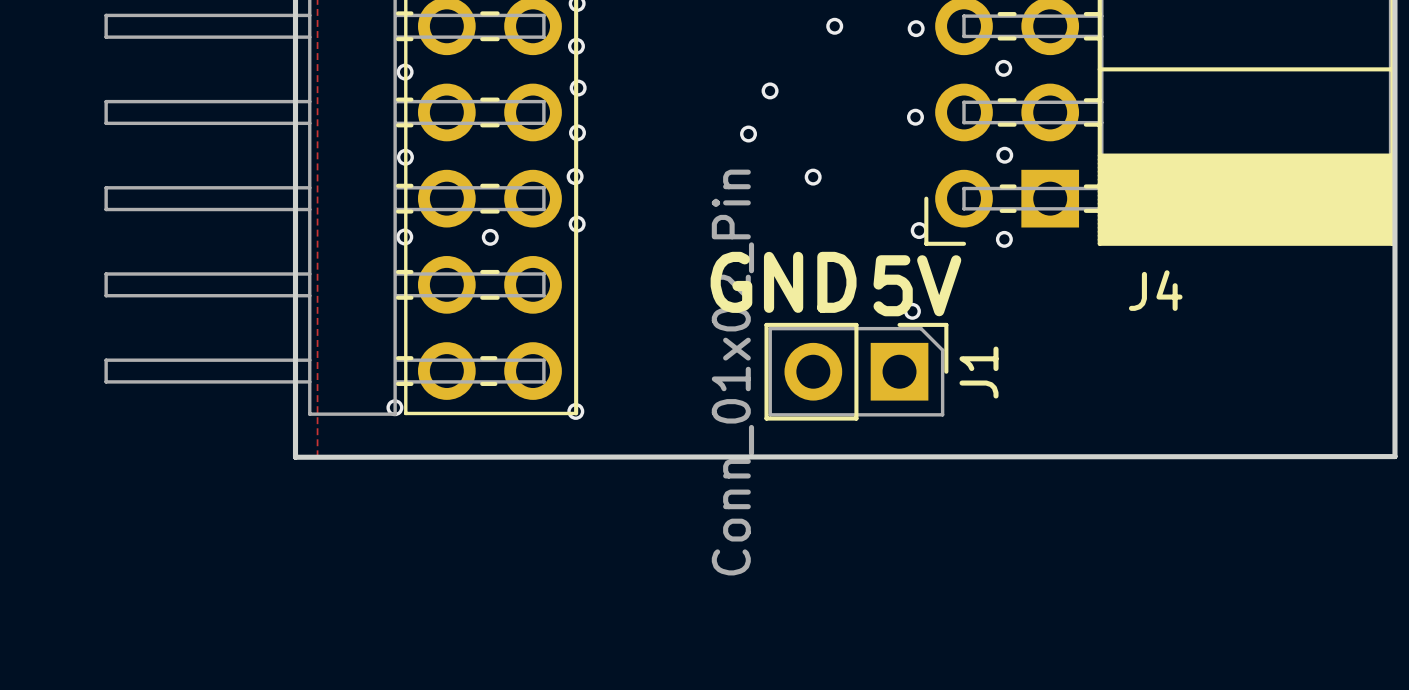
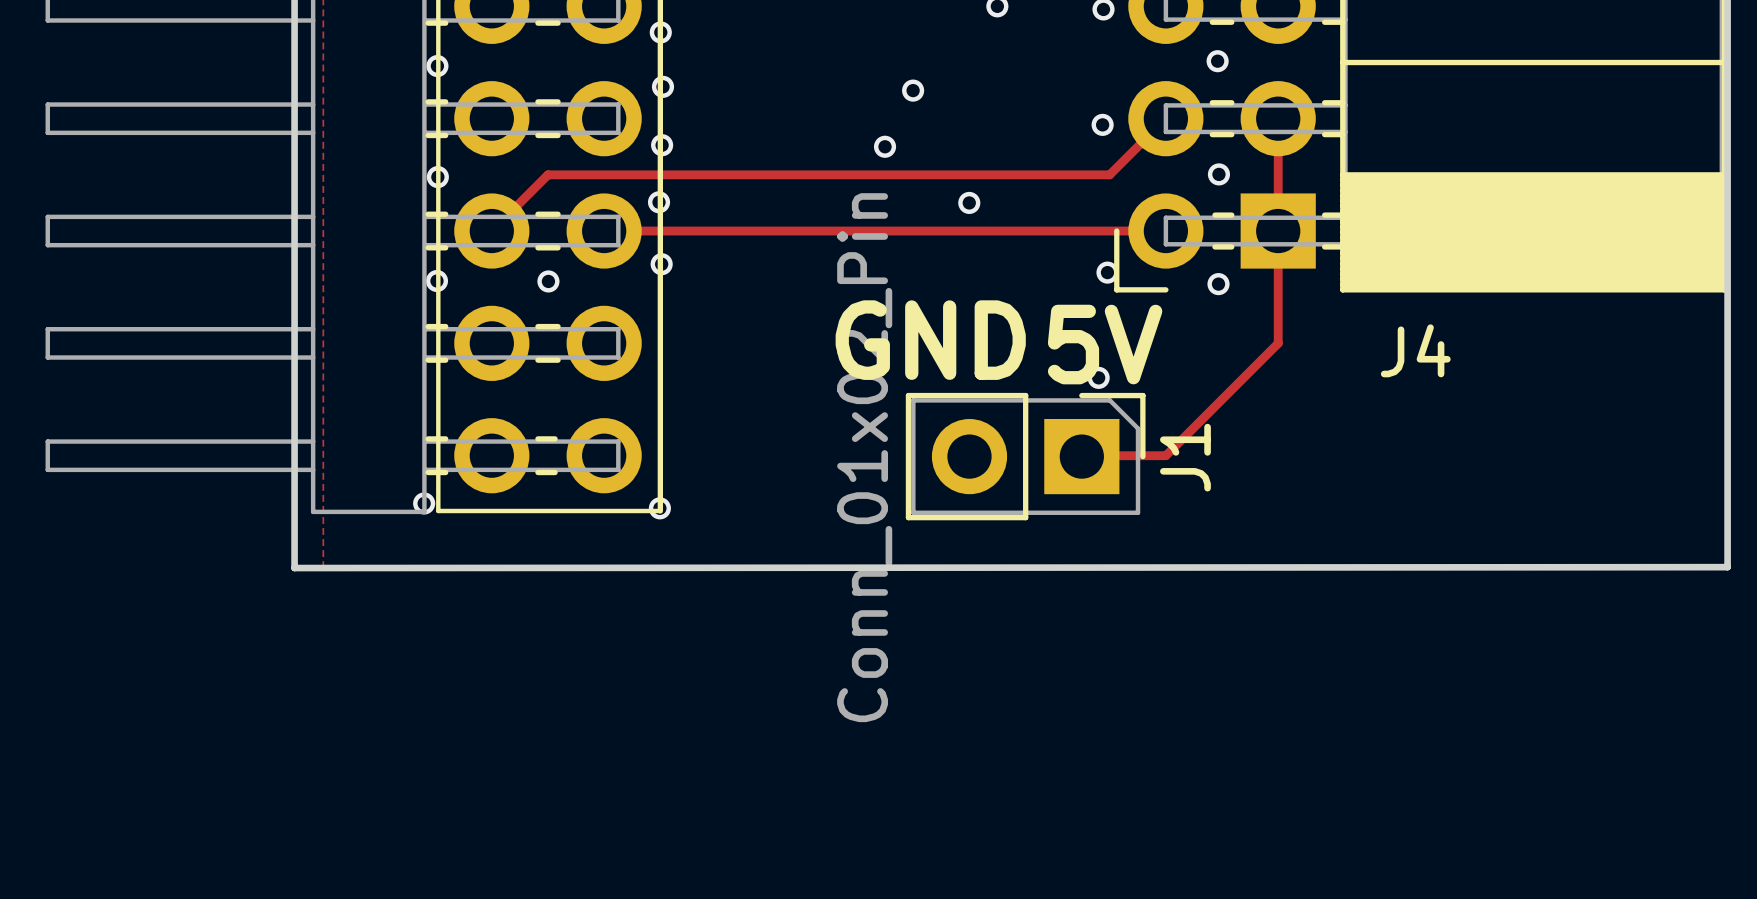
track: none -> (1165, 118) (1109, 174) (548, 174) (491, 231)
track: none -> (1278, 118) (1278, 343) (1165, 455) (1081, 455)
track: none -> (604, 231) (1165, 231)

